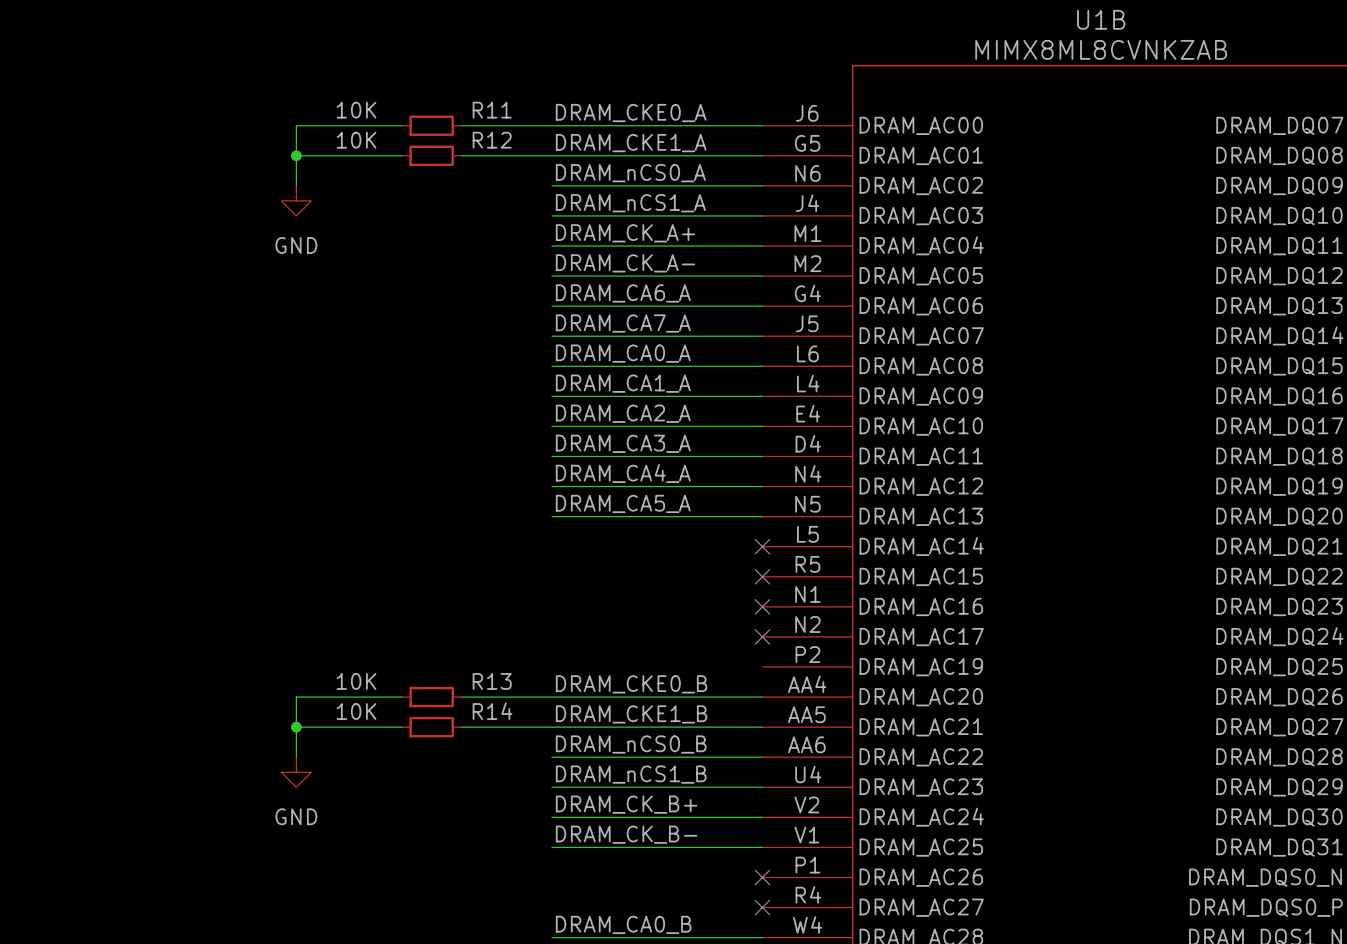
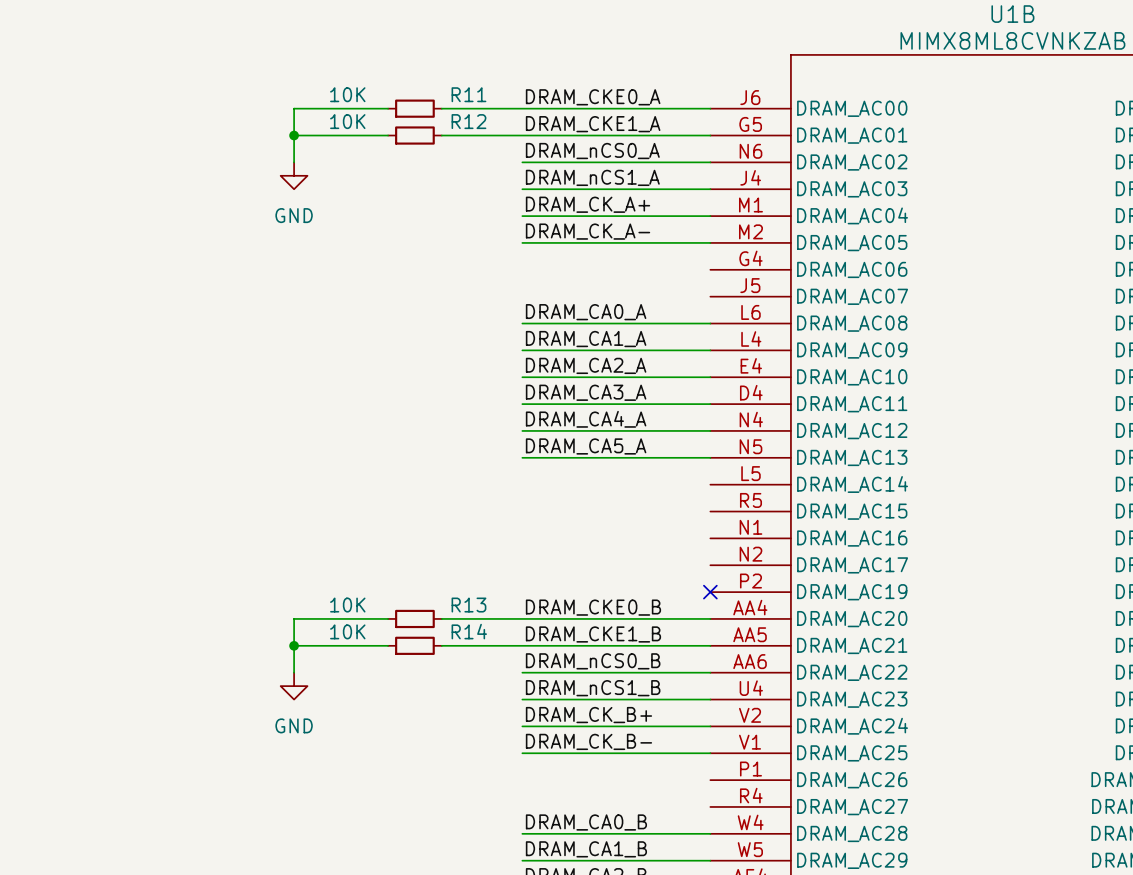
label: DRAM_CA6_A (623, 293) -> none
wire: (551, 306) (762, 306) -> none
label: DRAM_CA7_A (623, 323) -> none
wire: (551, 336) (762, 336) -> none
no-connect mark: (762, 546) -> none
no-connect mark: (762, 576) -> none
no-connect mark: (762, 606) -> none
no-connect mark: (762, 636) -> none
no-connect mark: none -> (710, 592)
no-connect mark: (762, 877) -> none
no-connect mark: (762, 907) -> none

